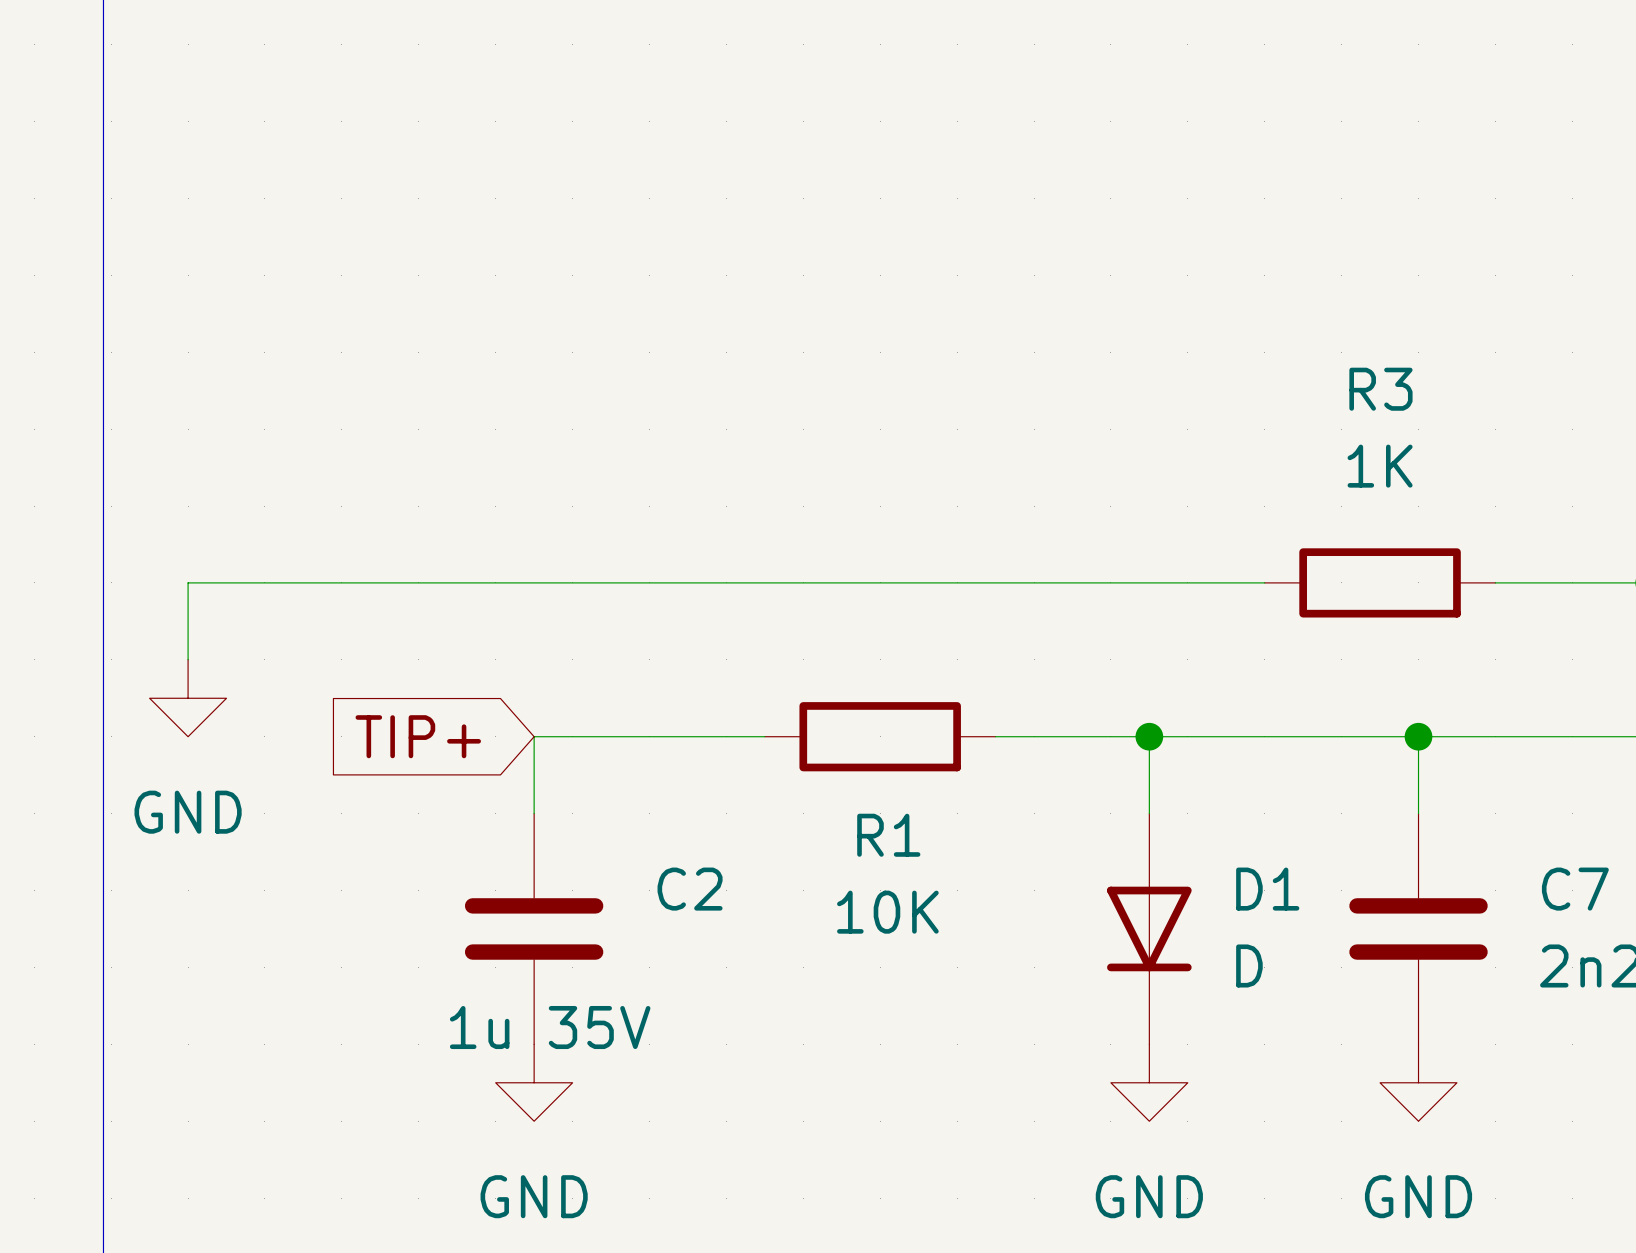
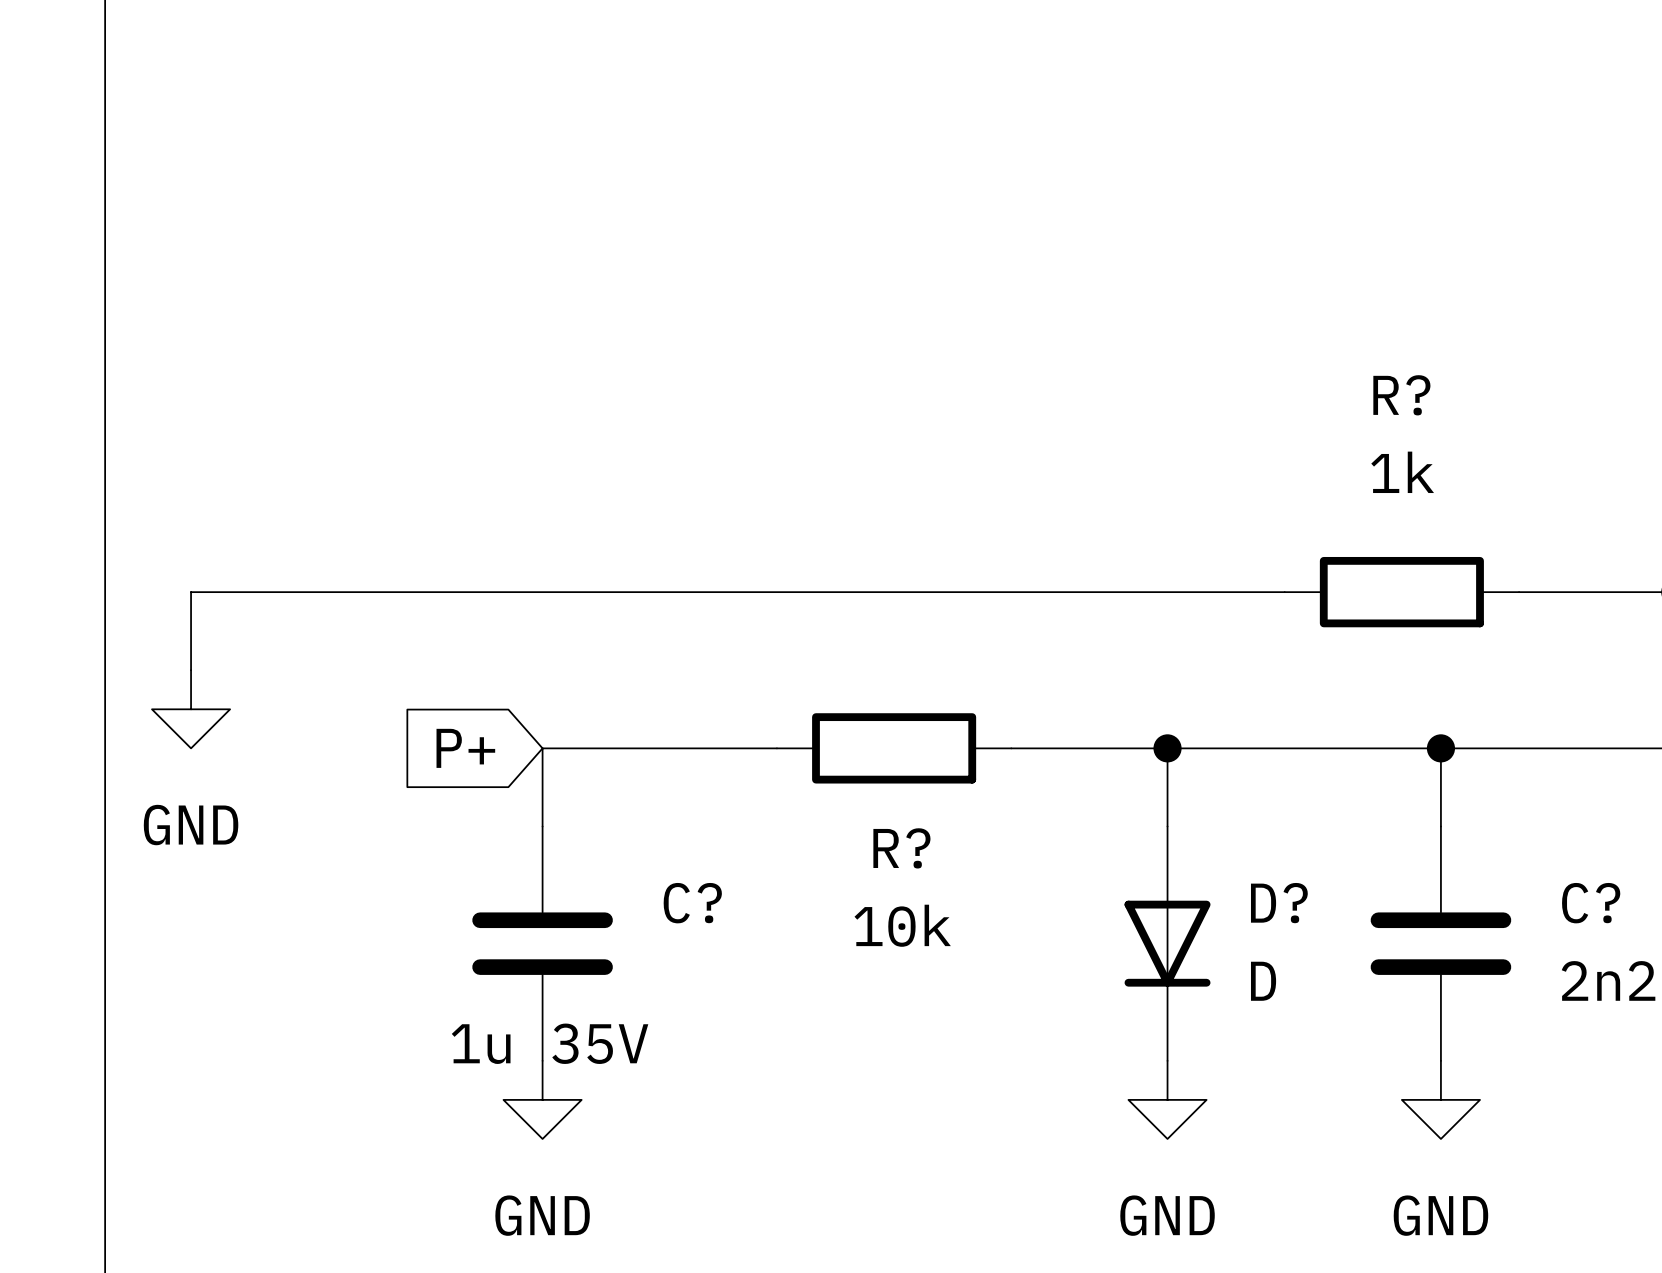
R3 name: R3 (1380, 389) -> R? (1401, 395)
R3 value: 1K (1380, 466) -> 1k (1402, 472)
global label: TIP+ (418, 736) -> P+ (465, 748)
R1 name: R1 (888, 835) -> R? (901, 848)
C2 name: C2 (690, 889) -> C? (692, 903)
D1 name: D1 (1267, 889) -> D? (1279, 903)
C7 name: C7 (1575, 889) -> C? (1591, 903)
R1 value: 10K (887, 912) -> 10k (902, 925)

